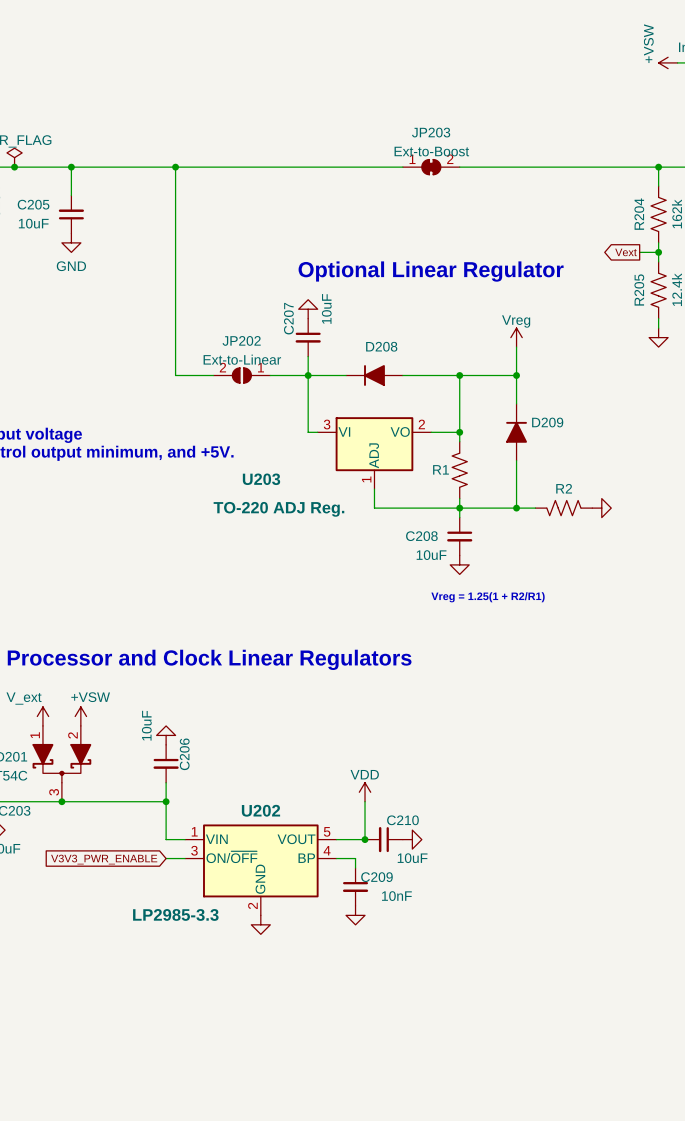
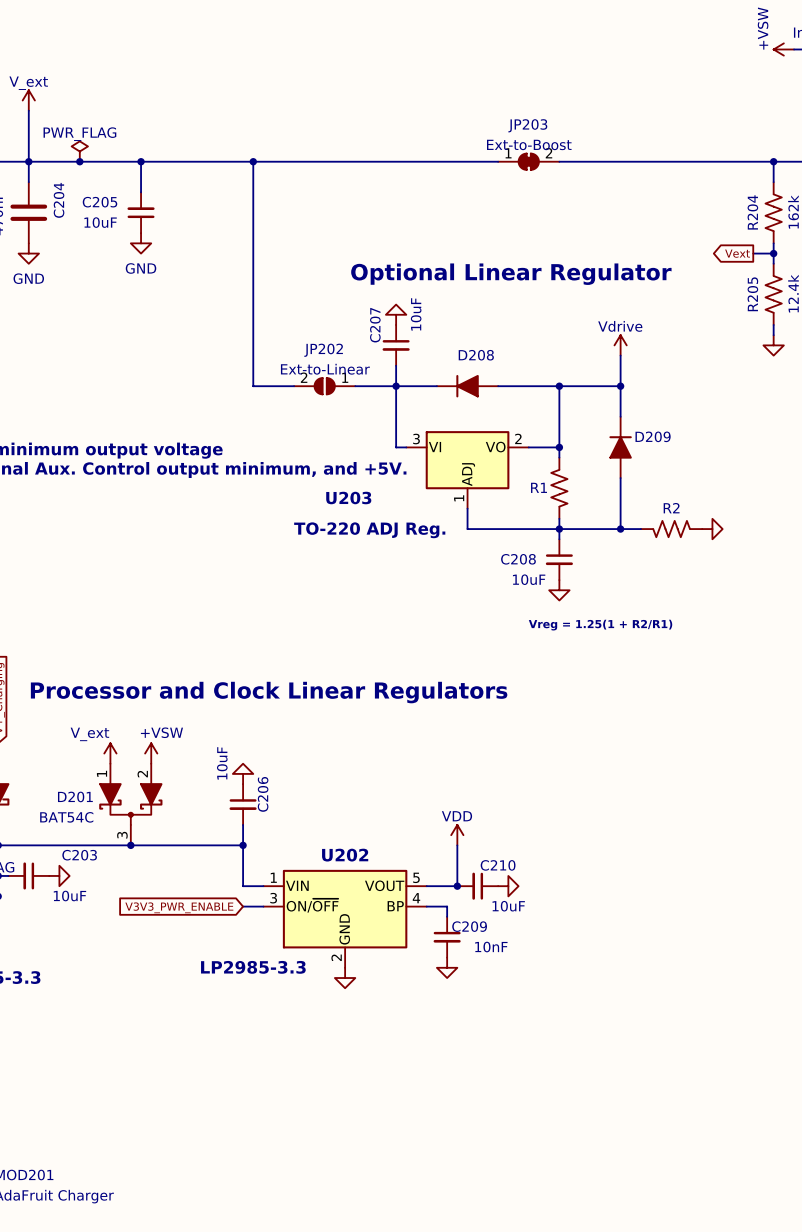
power symbol: Vreg (516, 337) -> Vdrive (620, 345)

